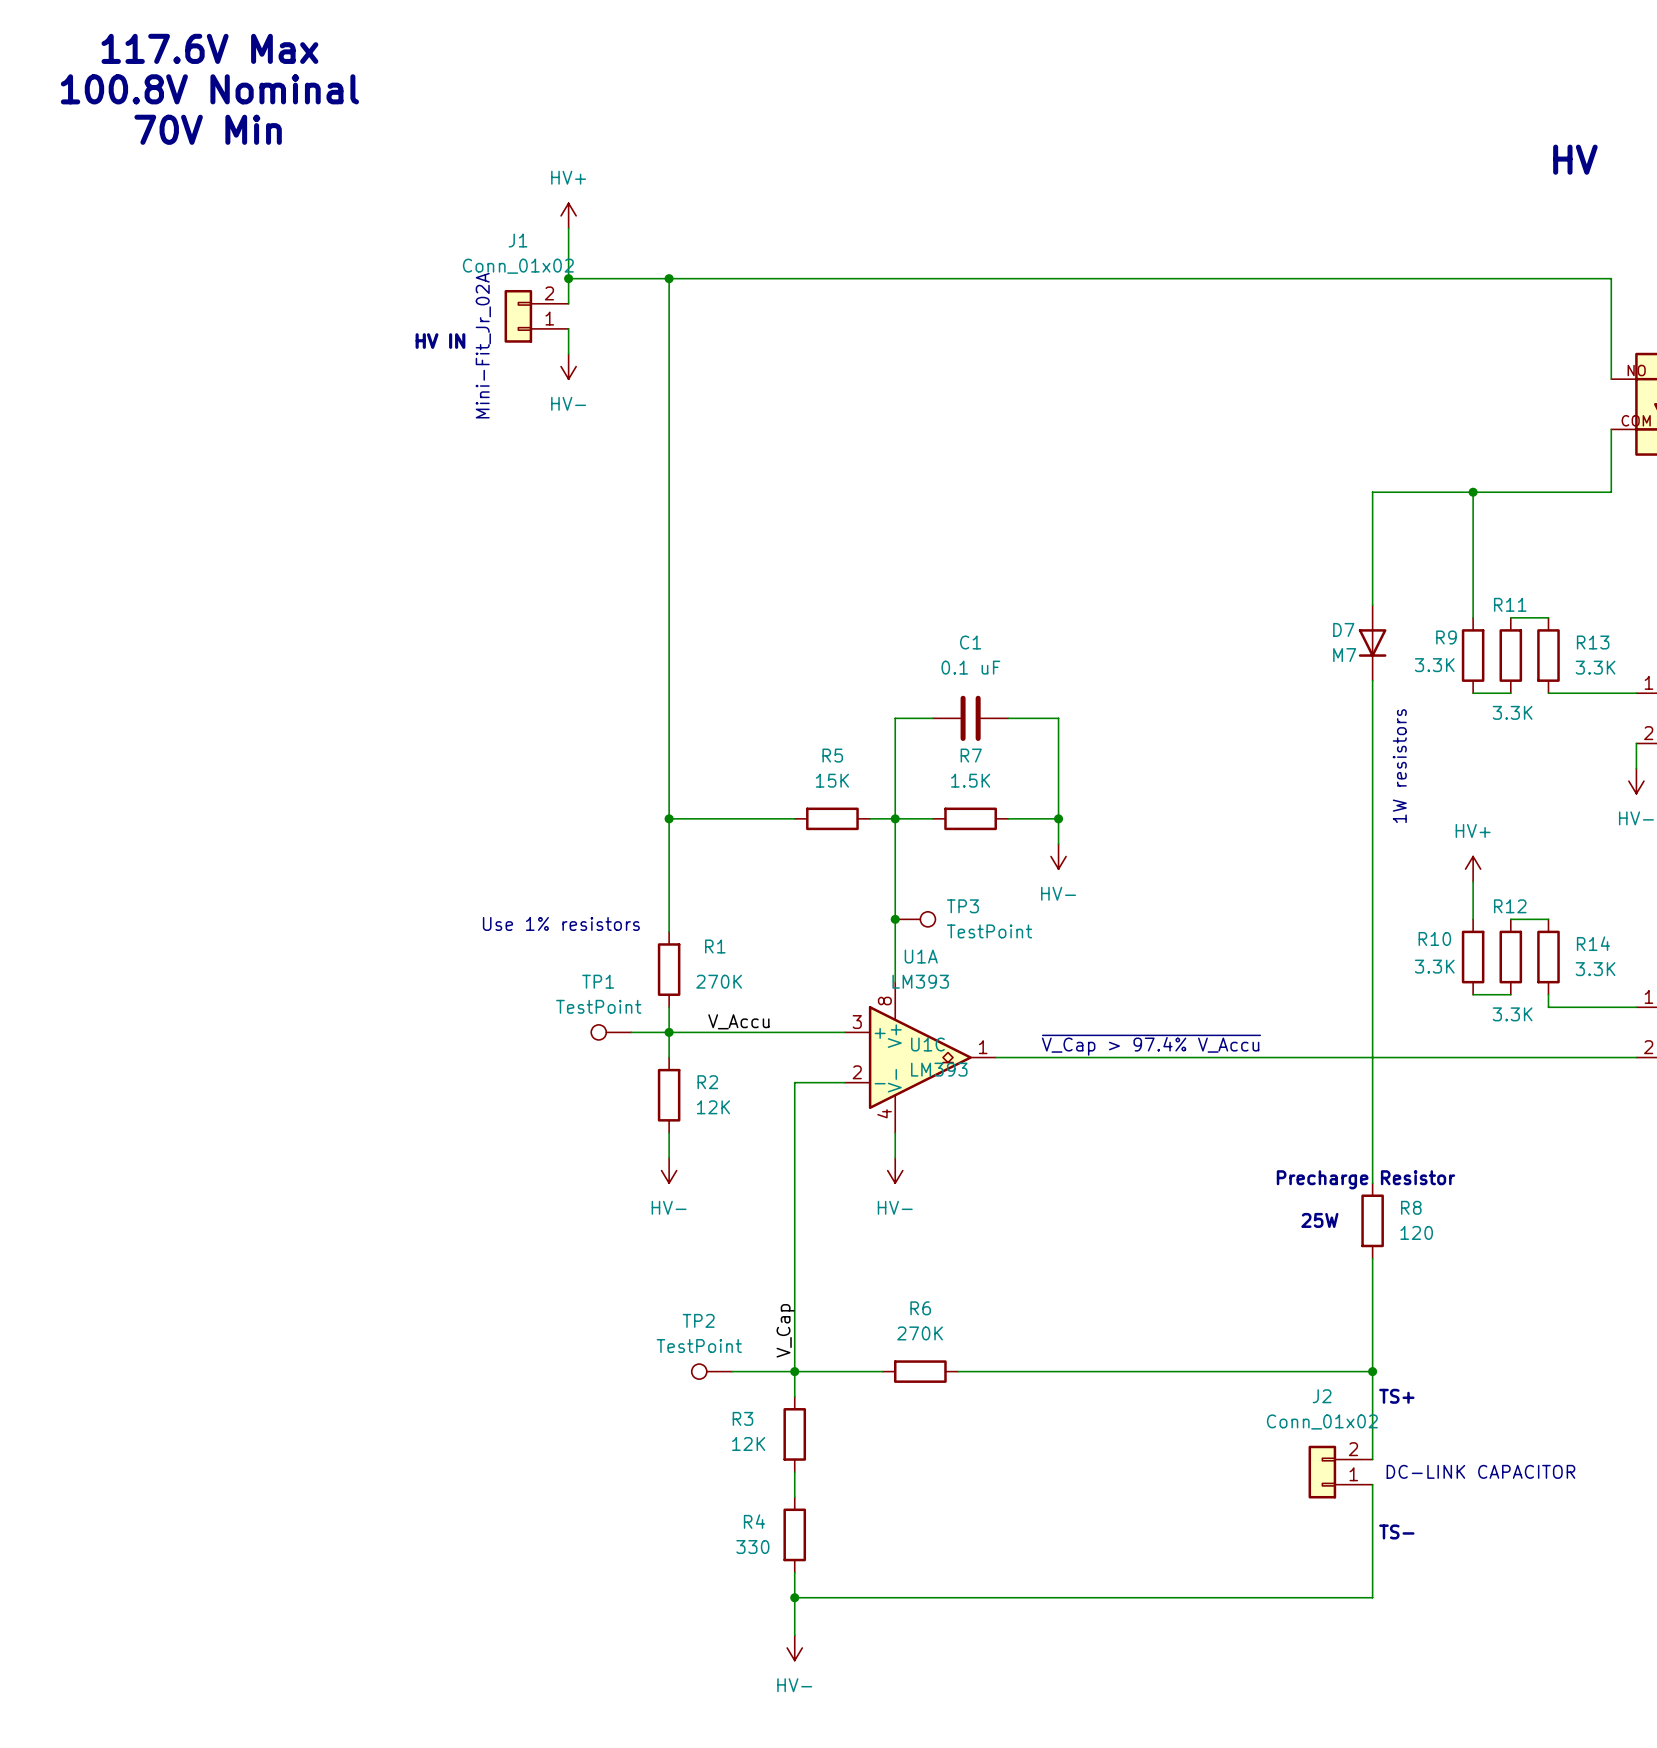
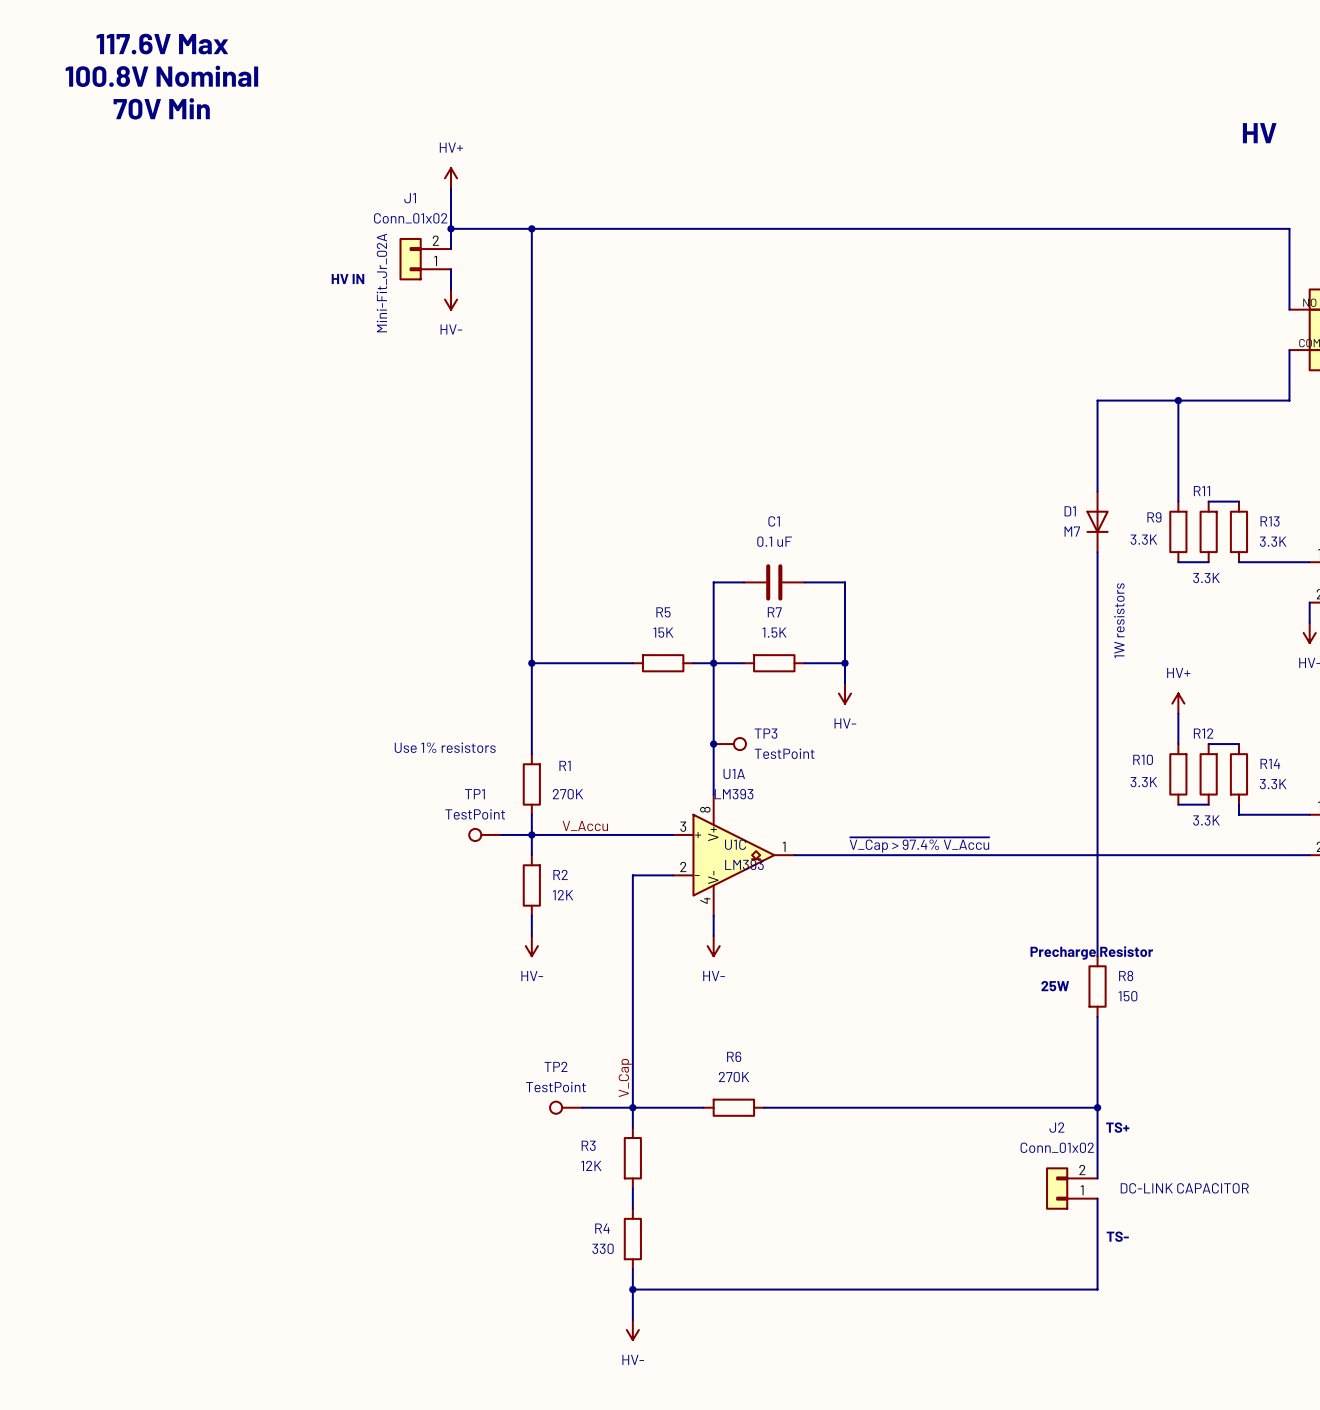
D7 name: D7 (1343, 629) -> D1 (1070, 511)
R8 value: 120 (1416, 1232) -> 150 (1127, 996)

